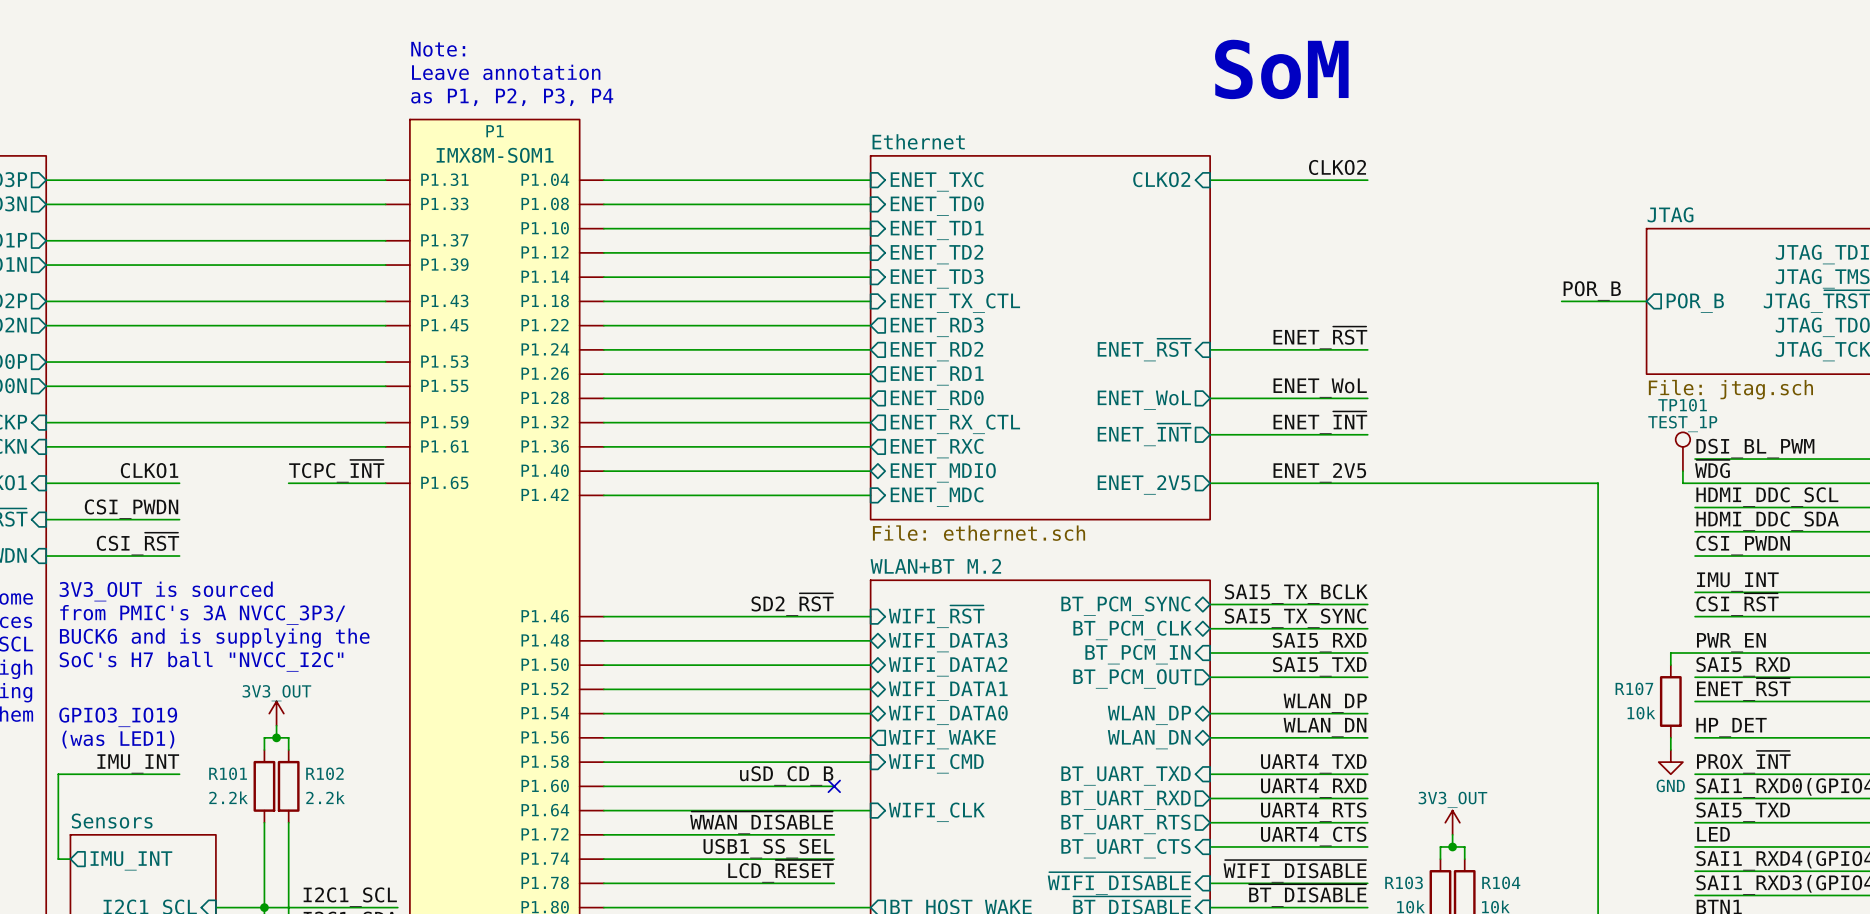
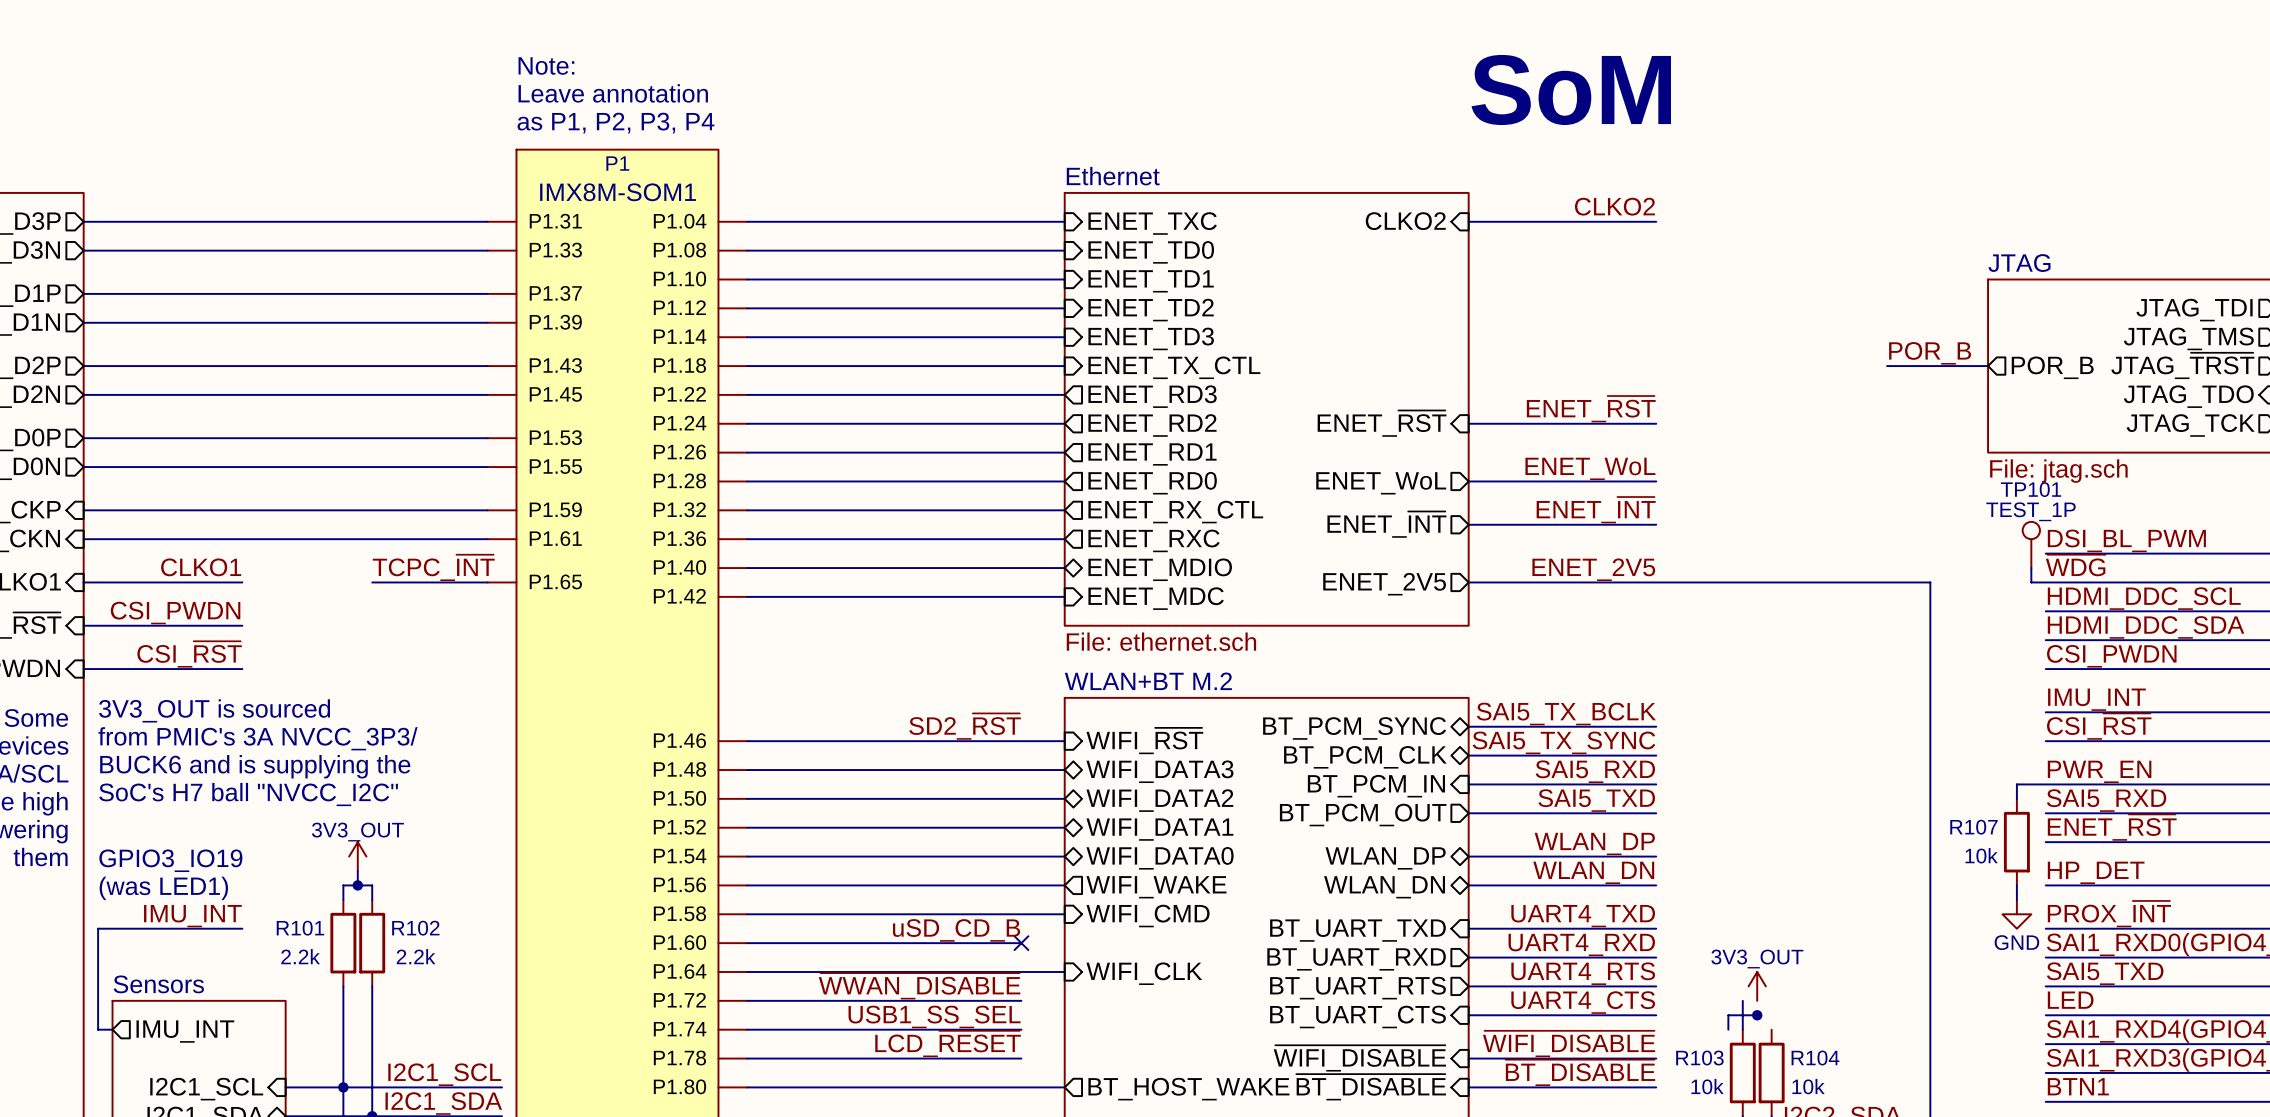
wire: none -> (1742, 1000) (1742, 1015) (1728, 1015) (1728, 1029)
wire: (1452, 834) (1452, 846) (1464, 846) (1464, 859) -> none

